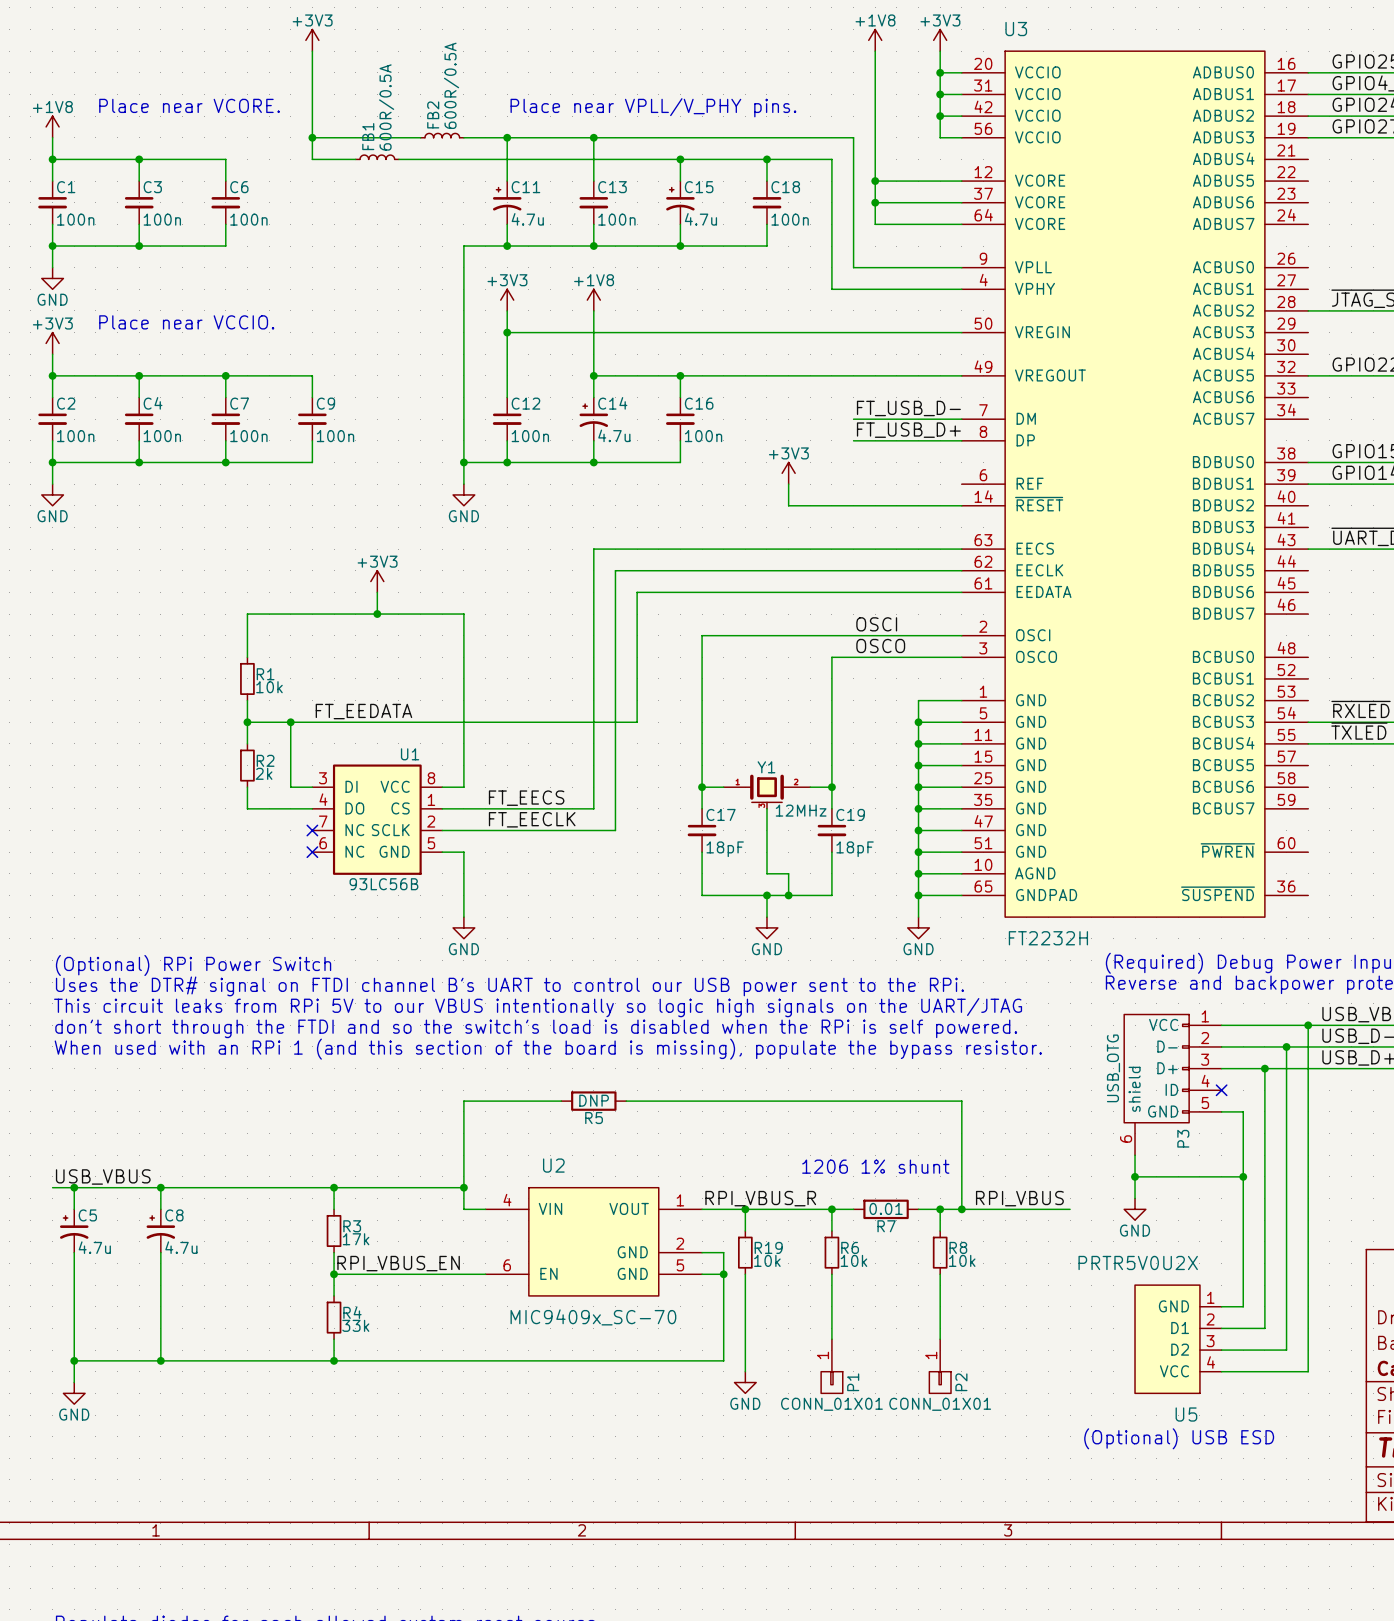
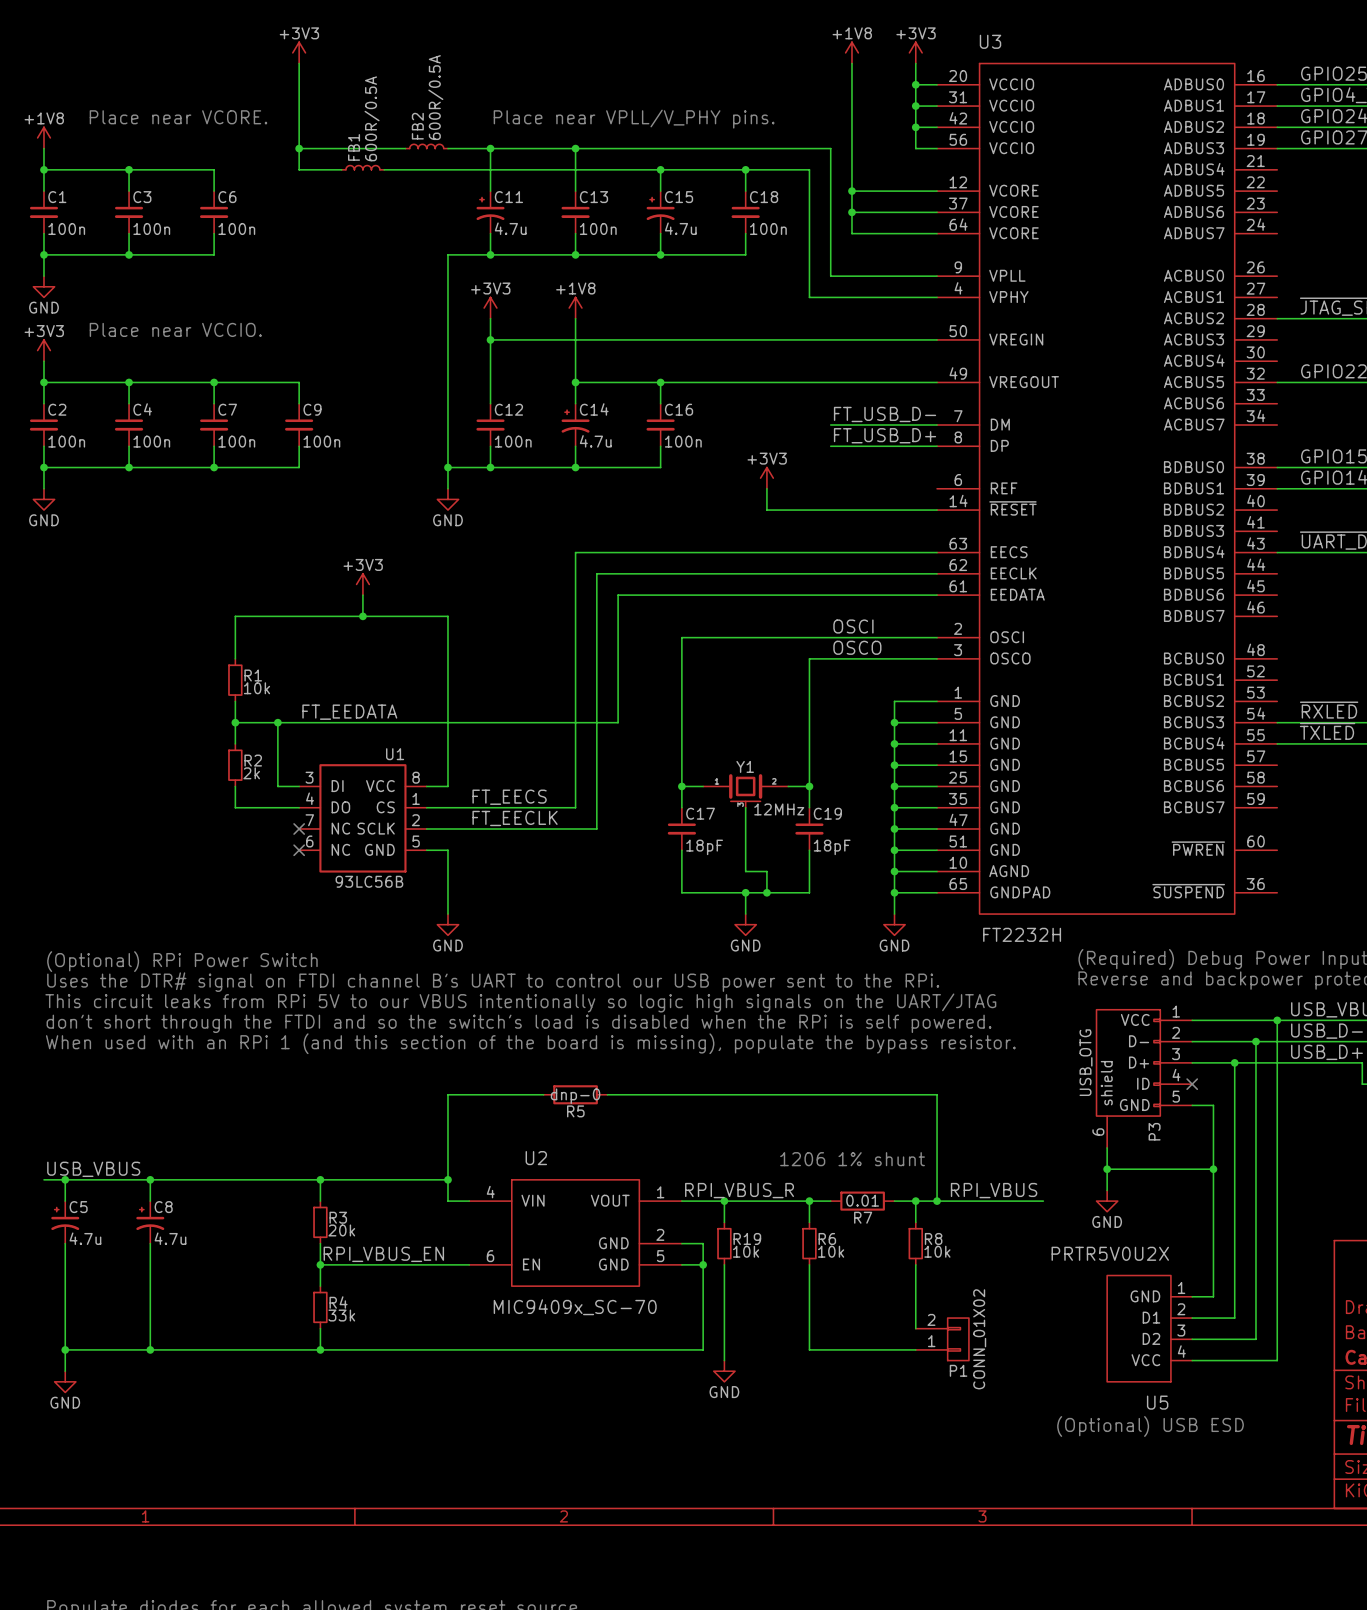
R5 value: DNP (594, 1100) -> dnp-0 (575, 1096)
R3 value: 17k (356, 1239) -> 20k (341, 1230)
P1 symbol: [821, 1339, 843, 1394] -> [915, 1318, 969, 1361]
wire: none -> (809, 1328) (809, 1349) (915, 1349)
P2: CONN_01X01 (940, 1366) -> none
P1 name position: P1 (853, 1382) -> P1 (958, 1370)
P1 value: CONN_01X01 (831, 1404) -> CONN_01X02 (979, 1339)

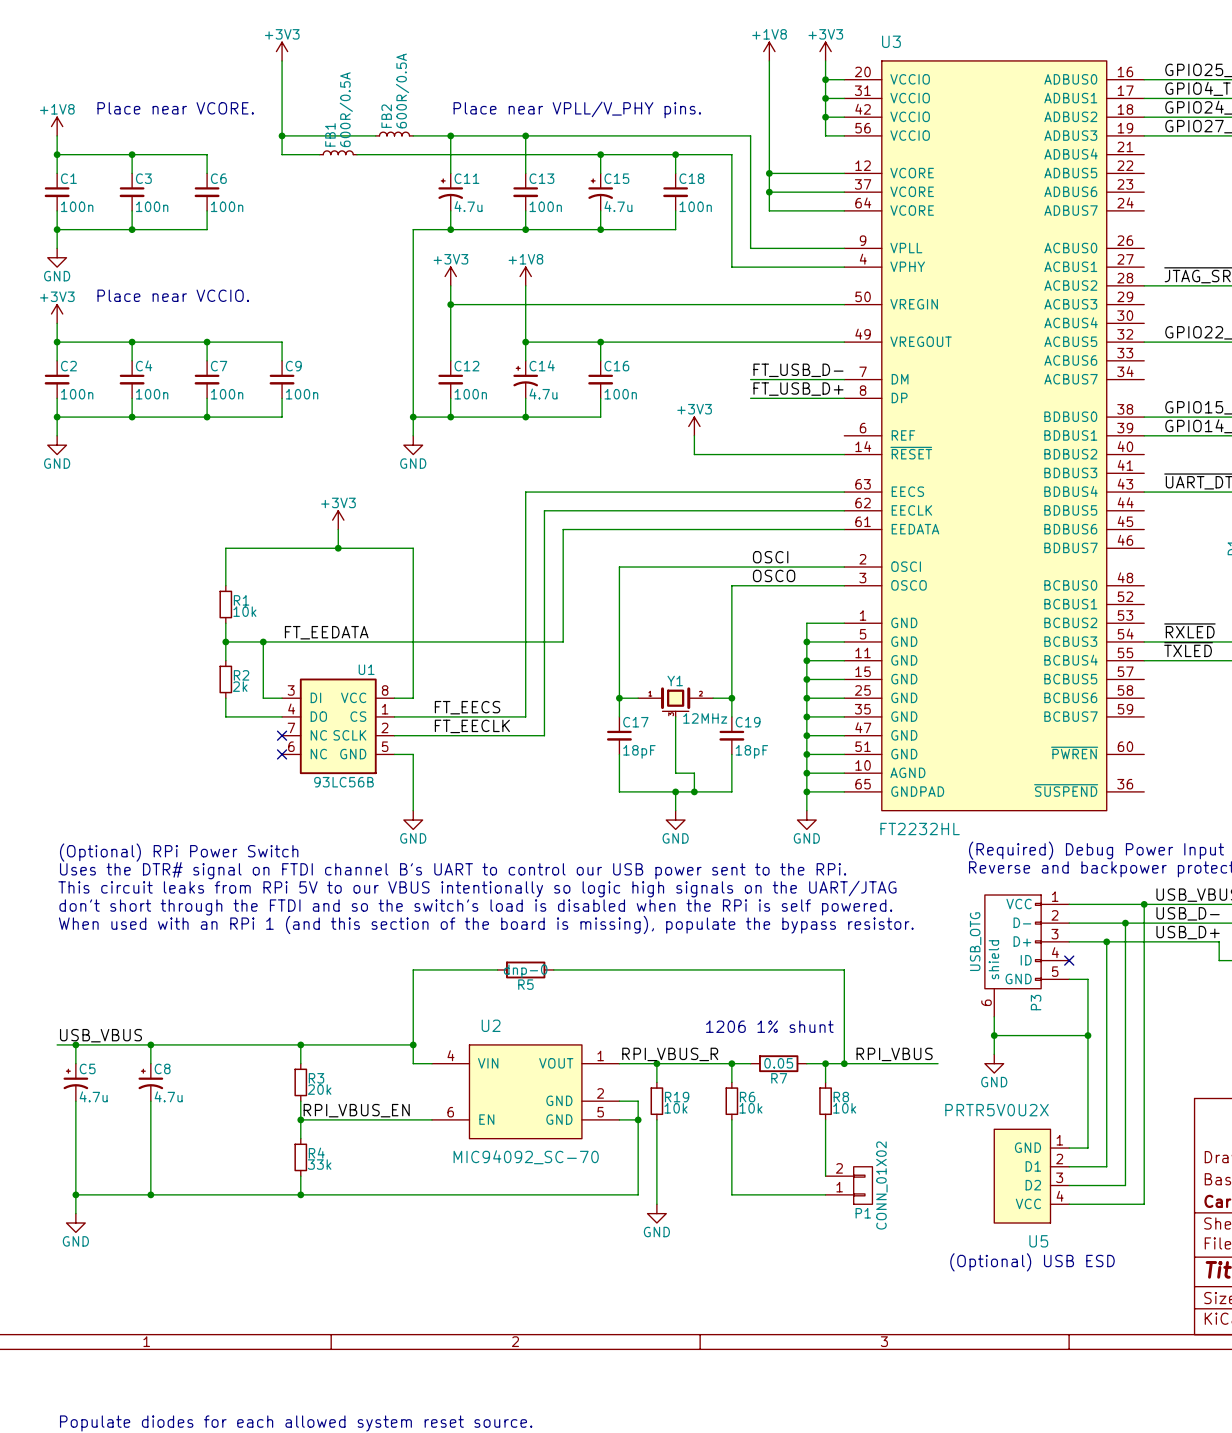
U3 value: FT2232H (1022, 934) -> FT2232HL (920, 828)
R7 value: 0.01 (862, 1200) -> 0.05 (778, 1063)
U2 value: MIC9409x_SC-70 (575, 1307) -> MIC94092_SC-70 (526, 1157)

